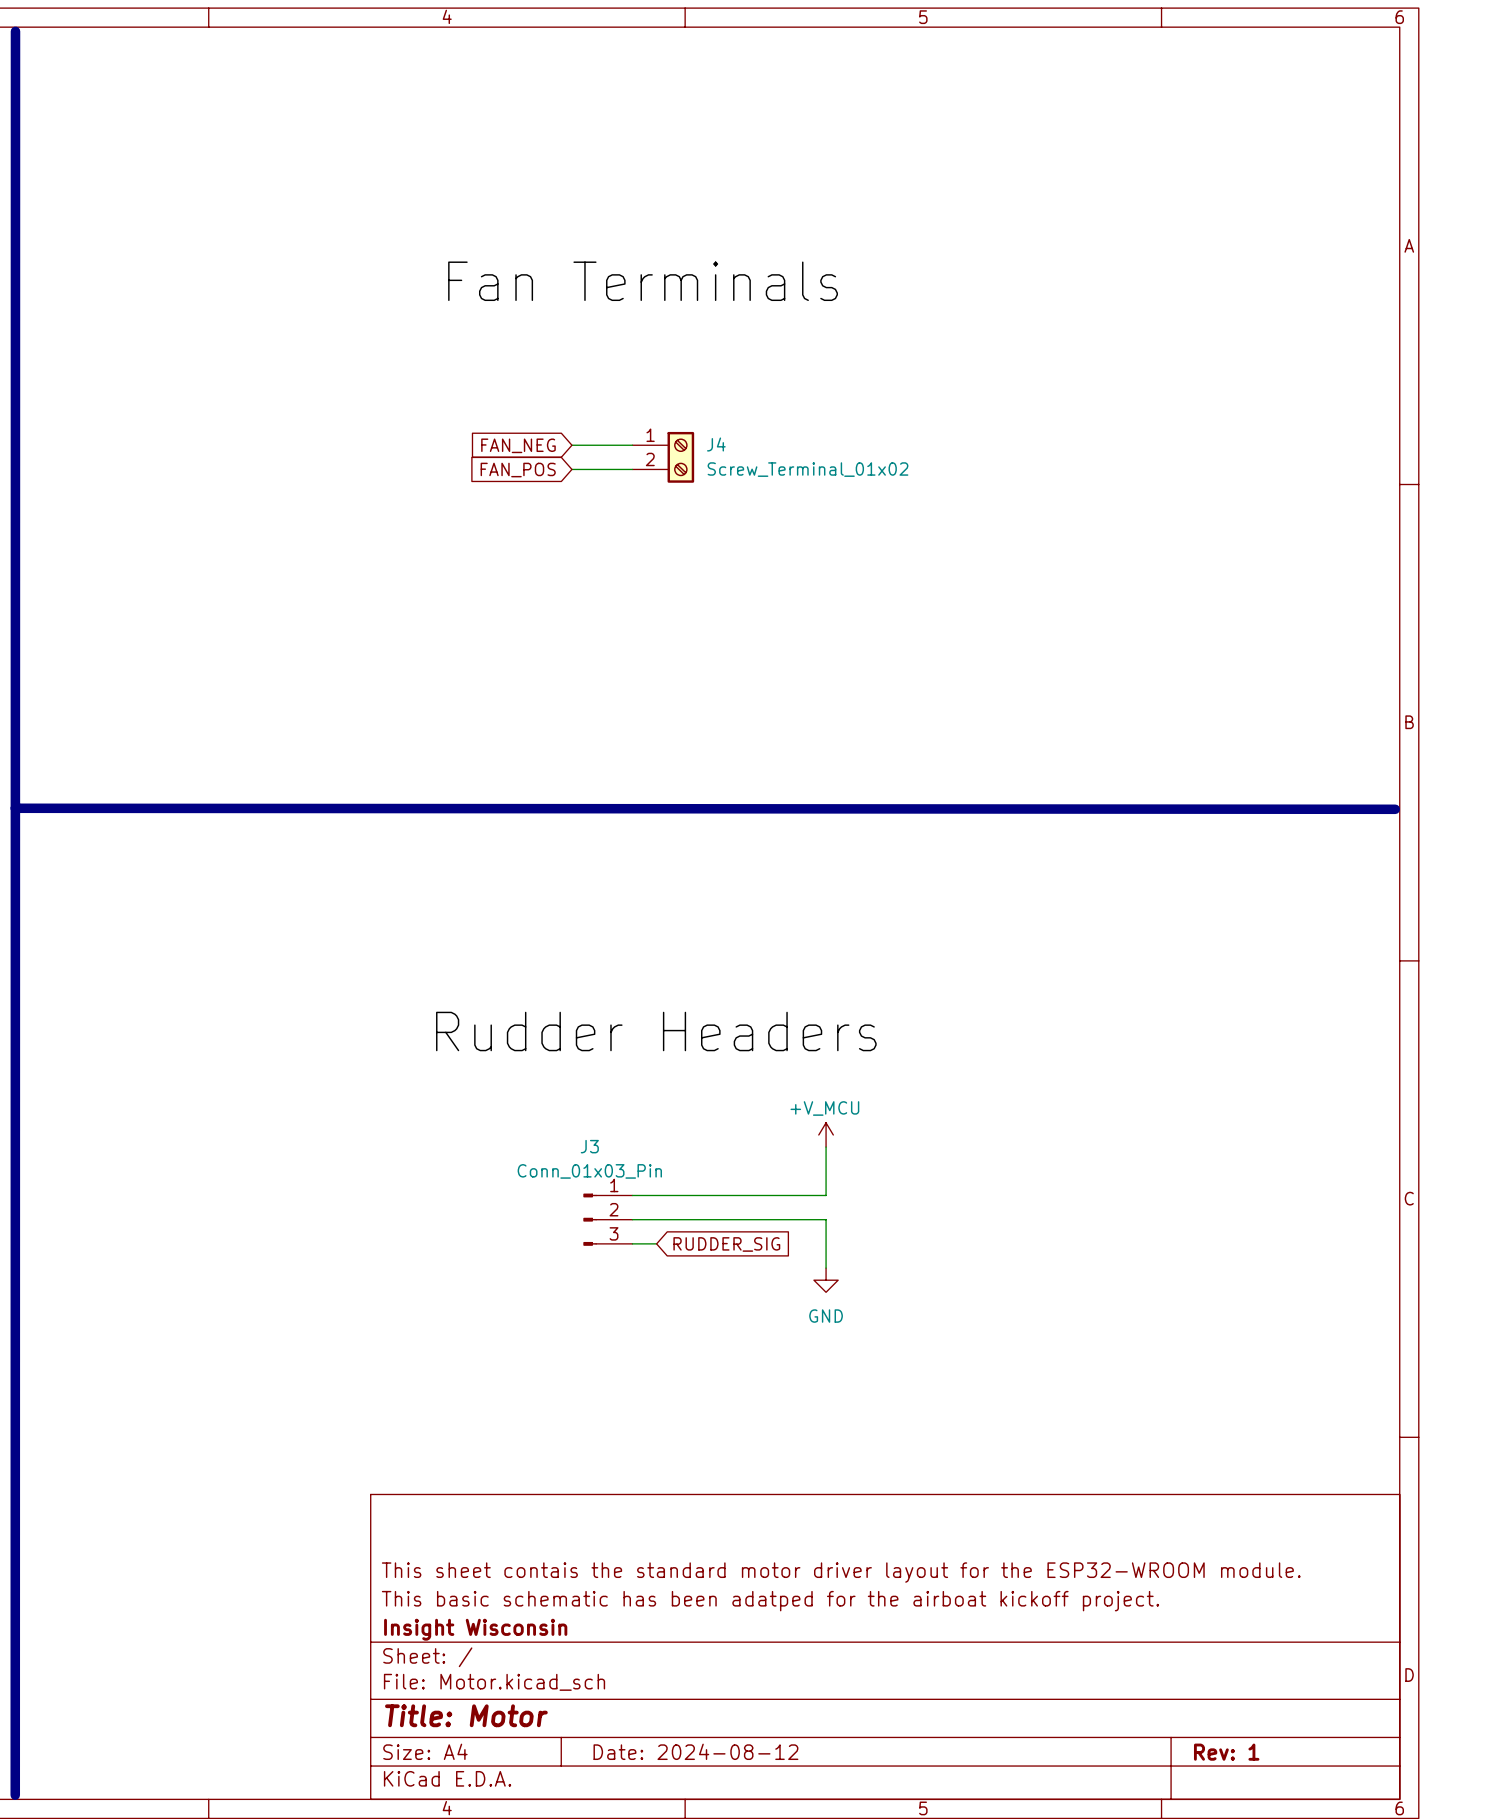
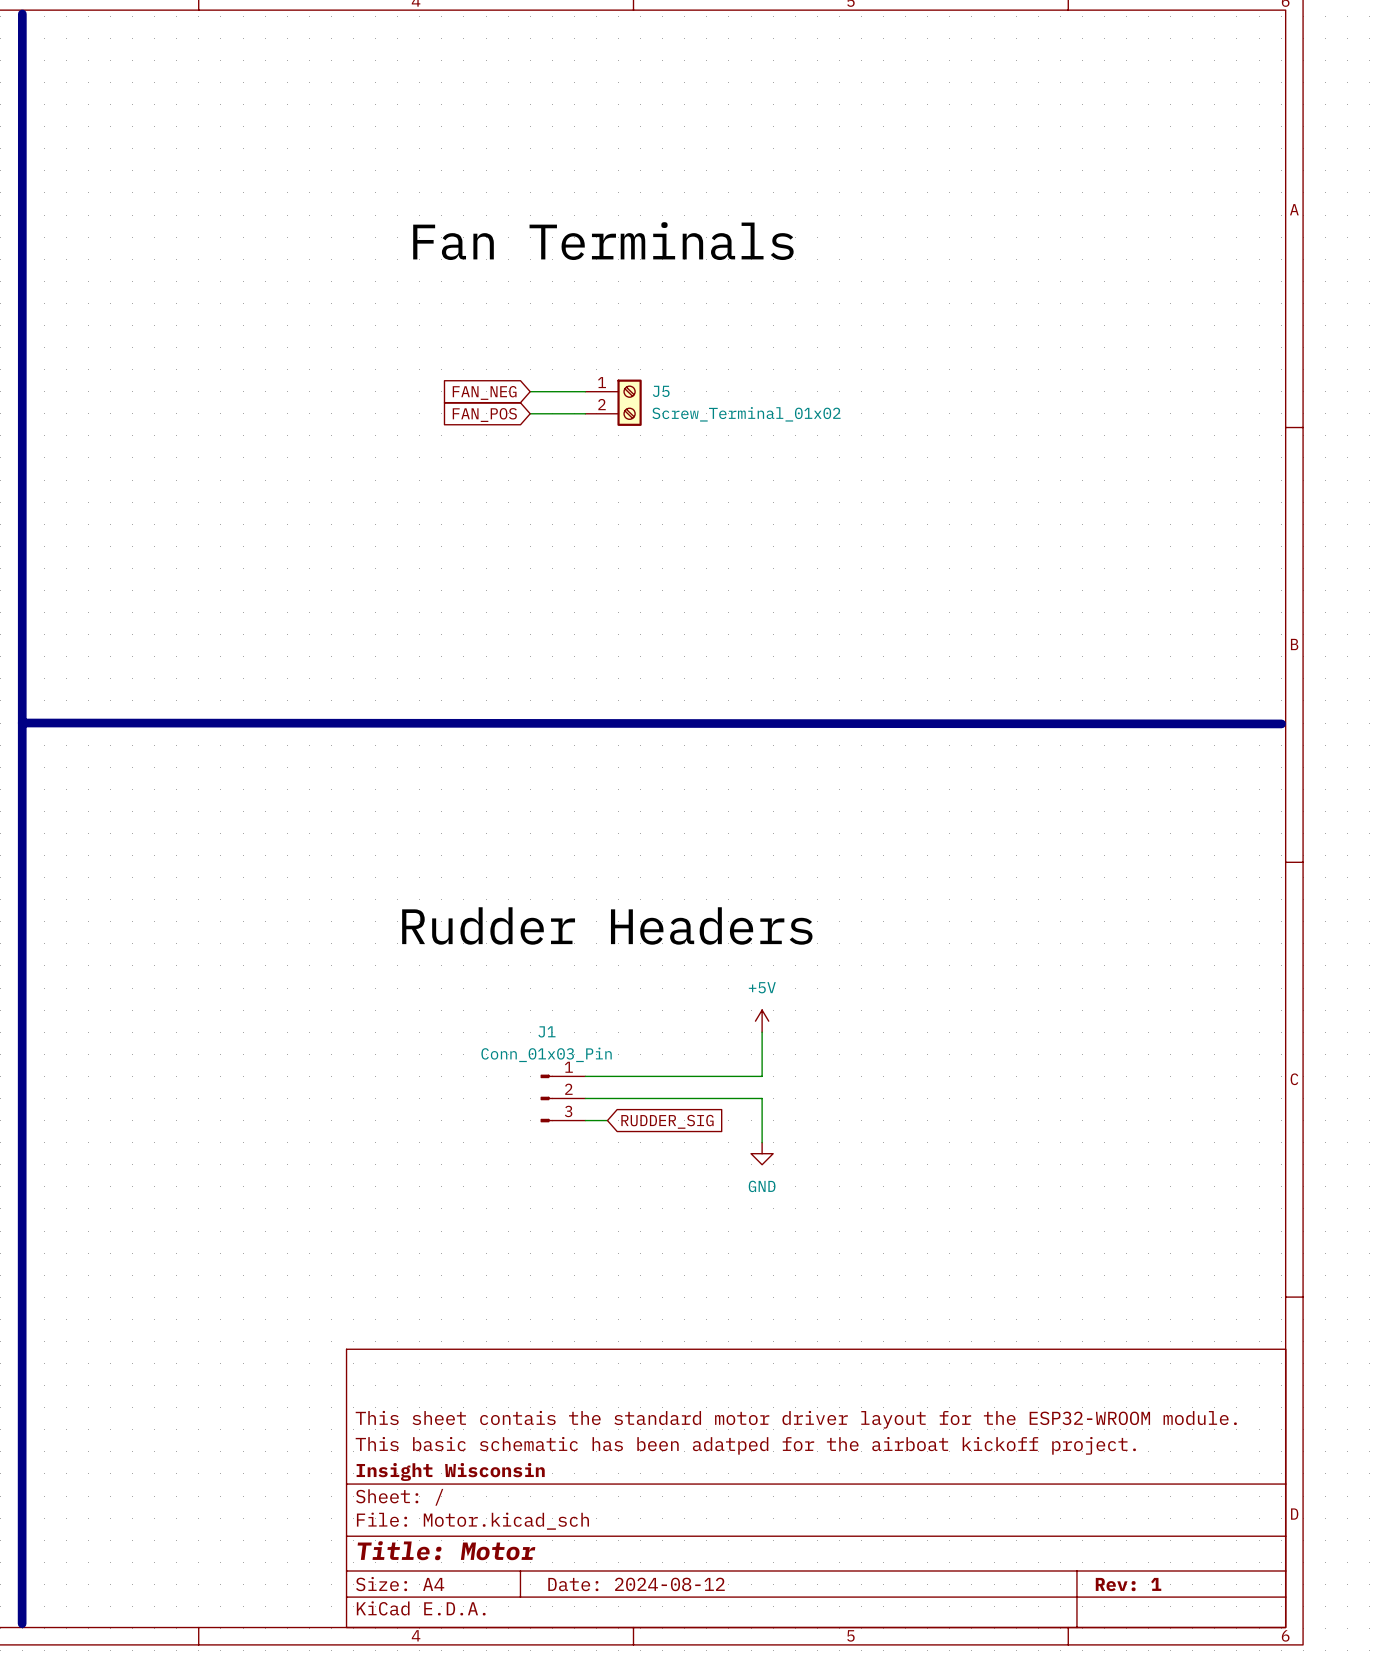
J4 name: J4 (716, 444) -> J5 (661, 391)
power symbol: +V_MCU (826, 1134) -> +5V (762, 1021)
J3 name: J3 (589, 1146) -> J1 (546, 1031)

